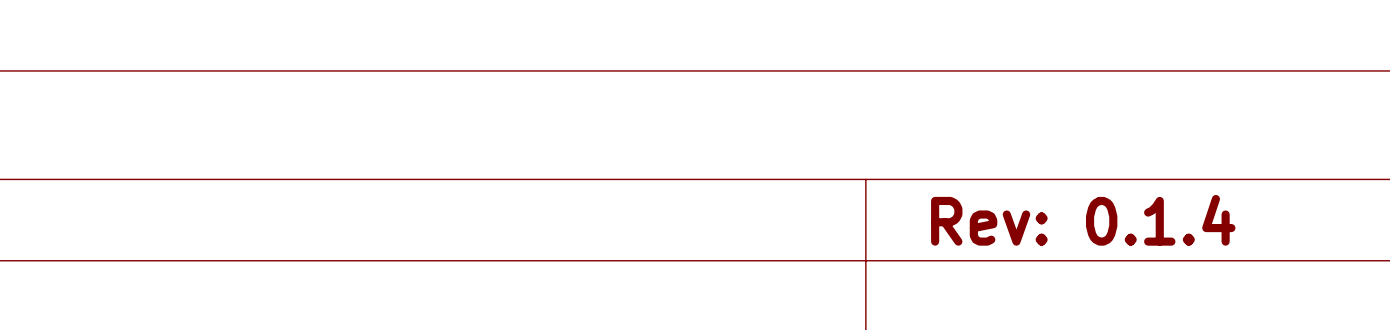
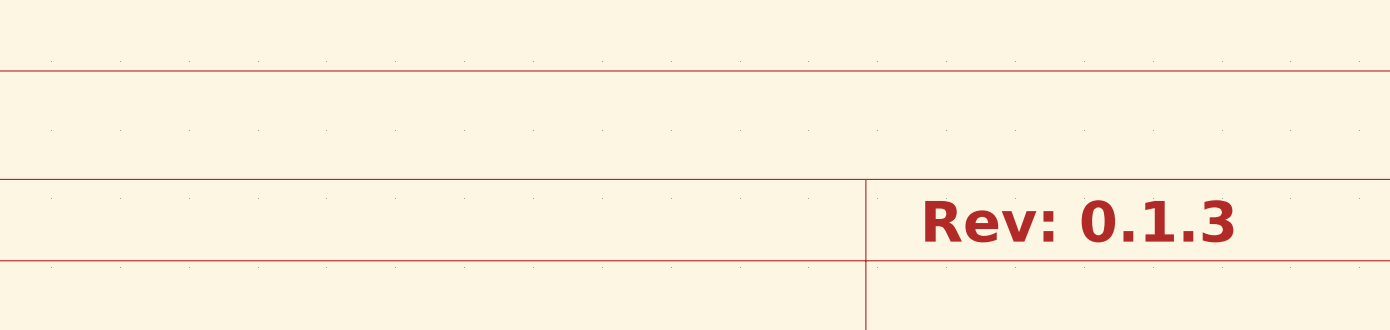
title block: Rev: 0.1.4 (1083, 220) -> Rev: 0.1.3 (1079, 221)

